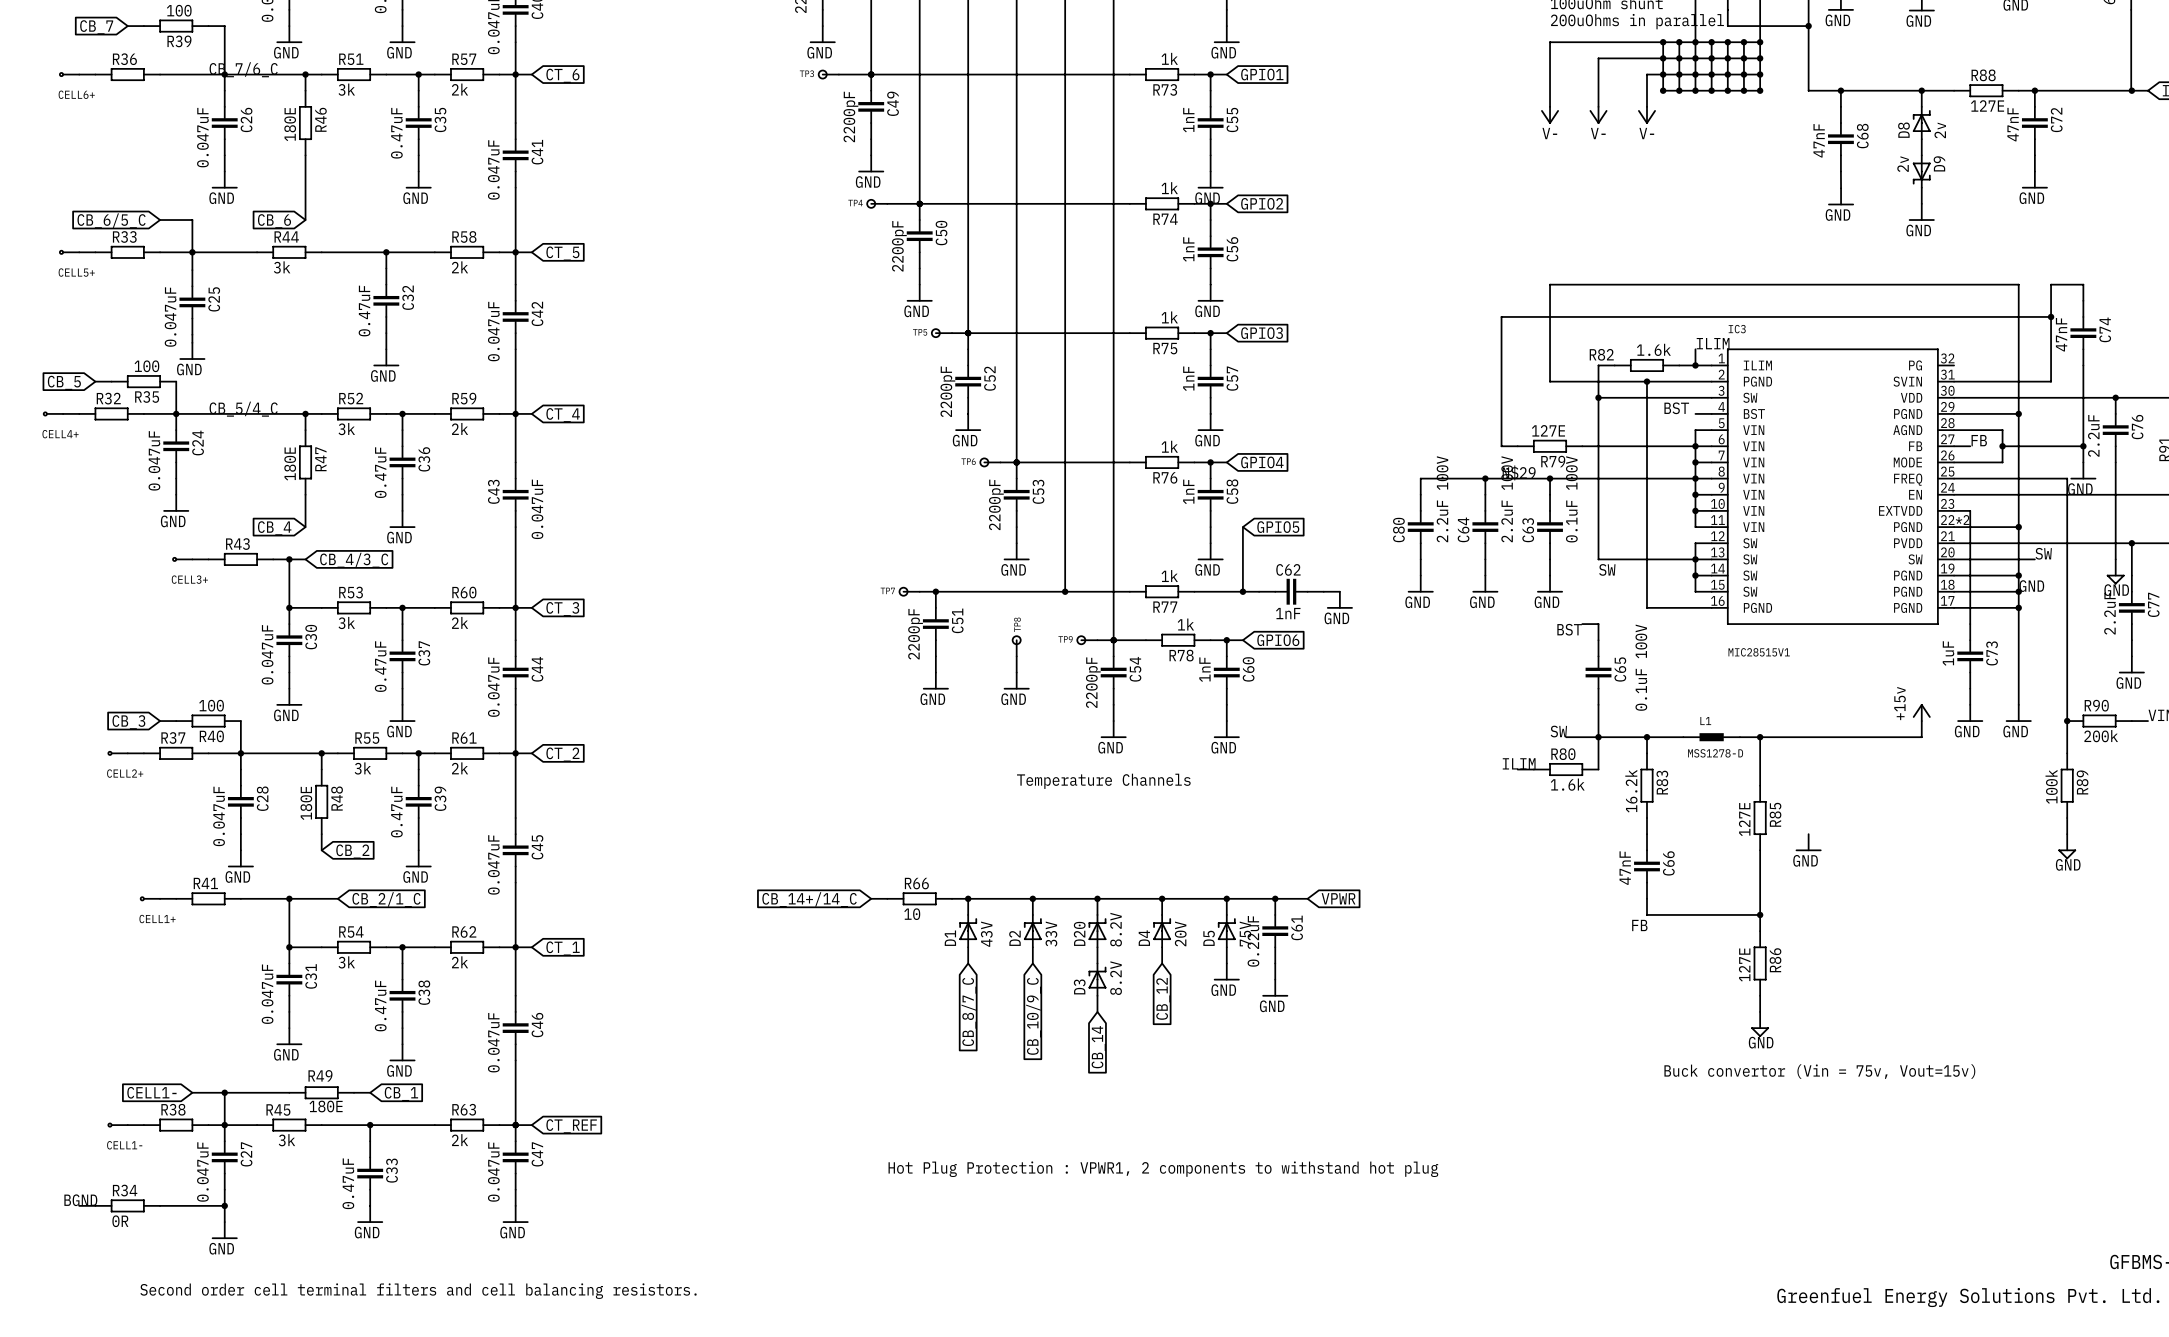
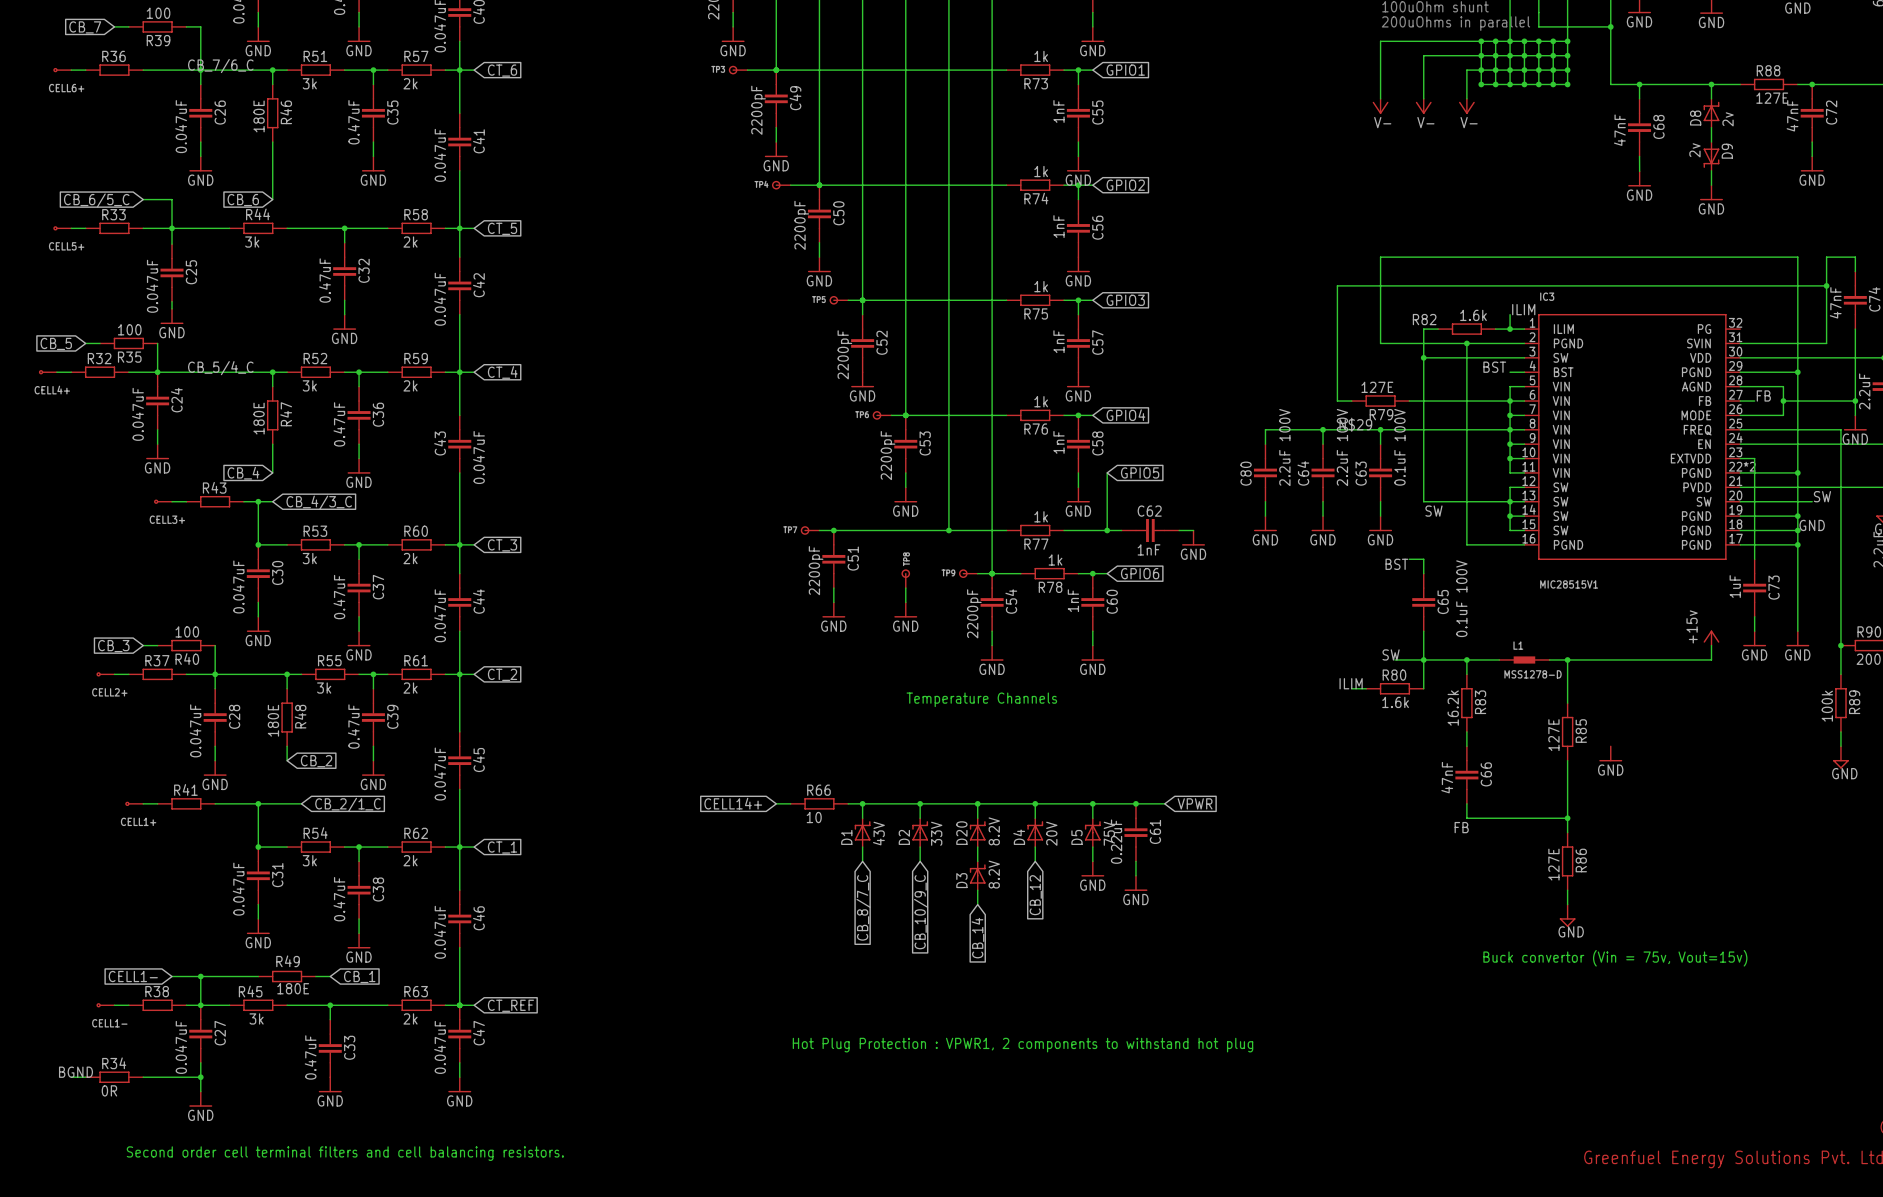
global label: CB_14+/14_C (809, 899) -> CELL14+ (733, 803)

